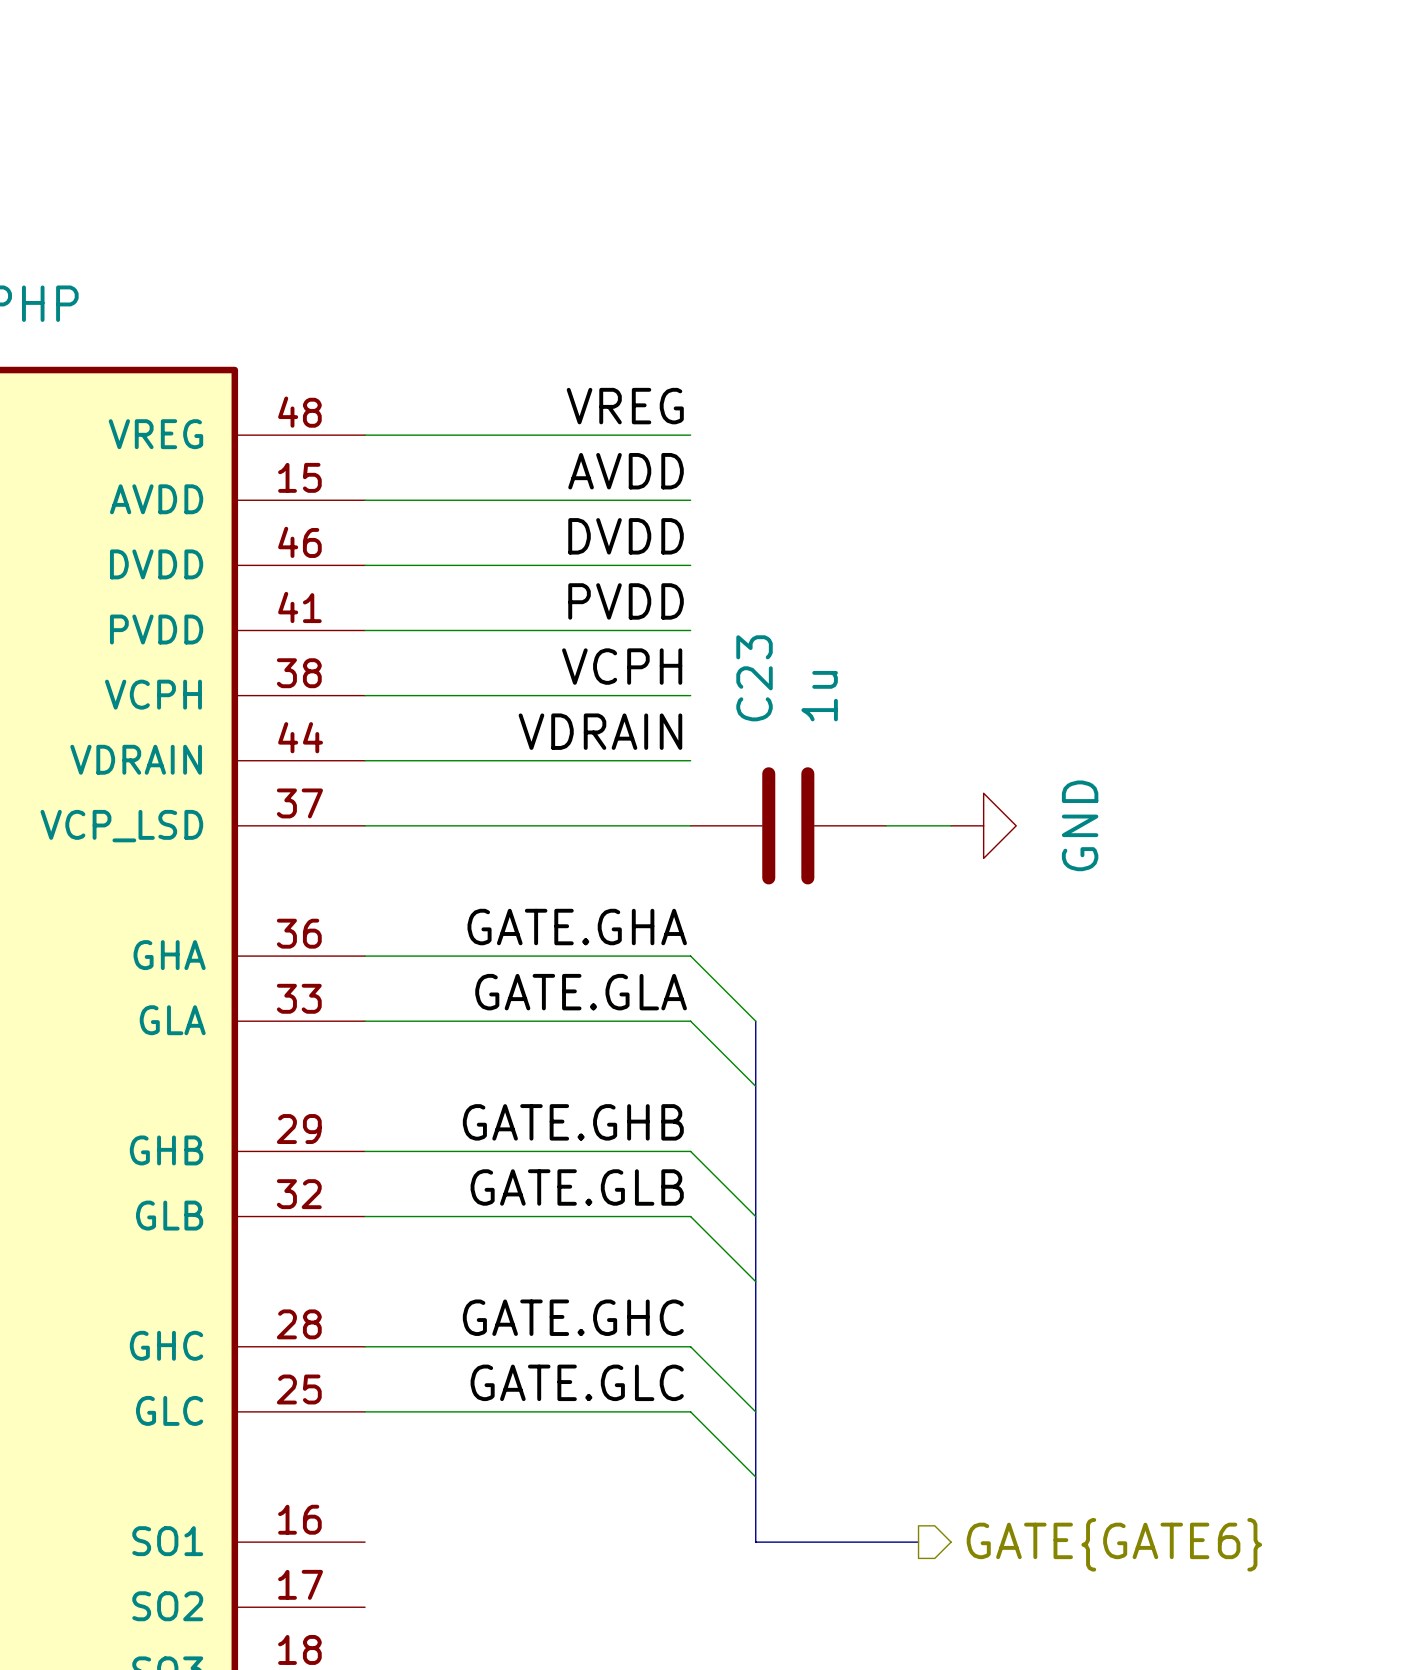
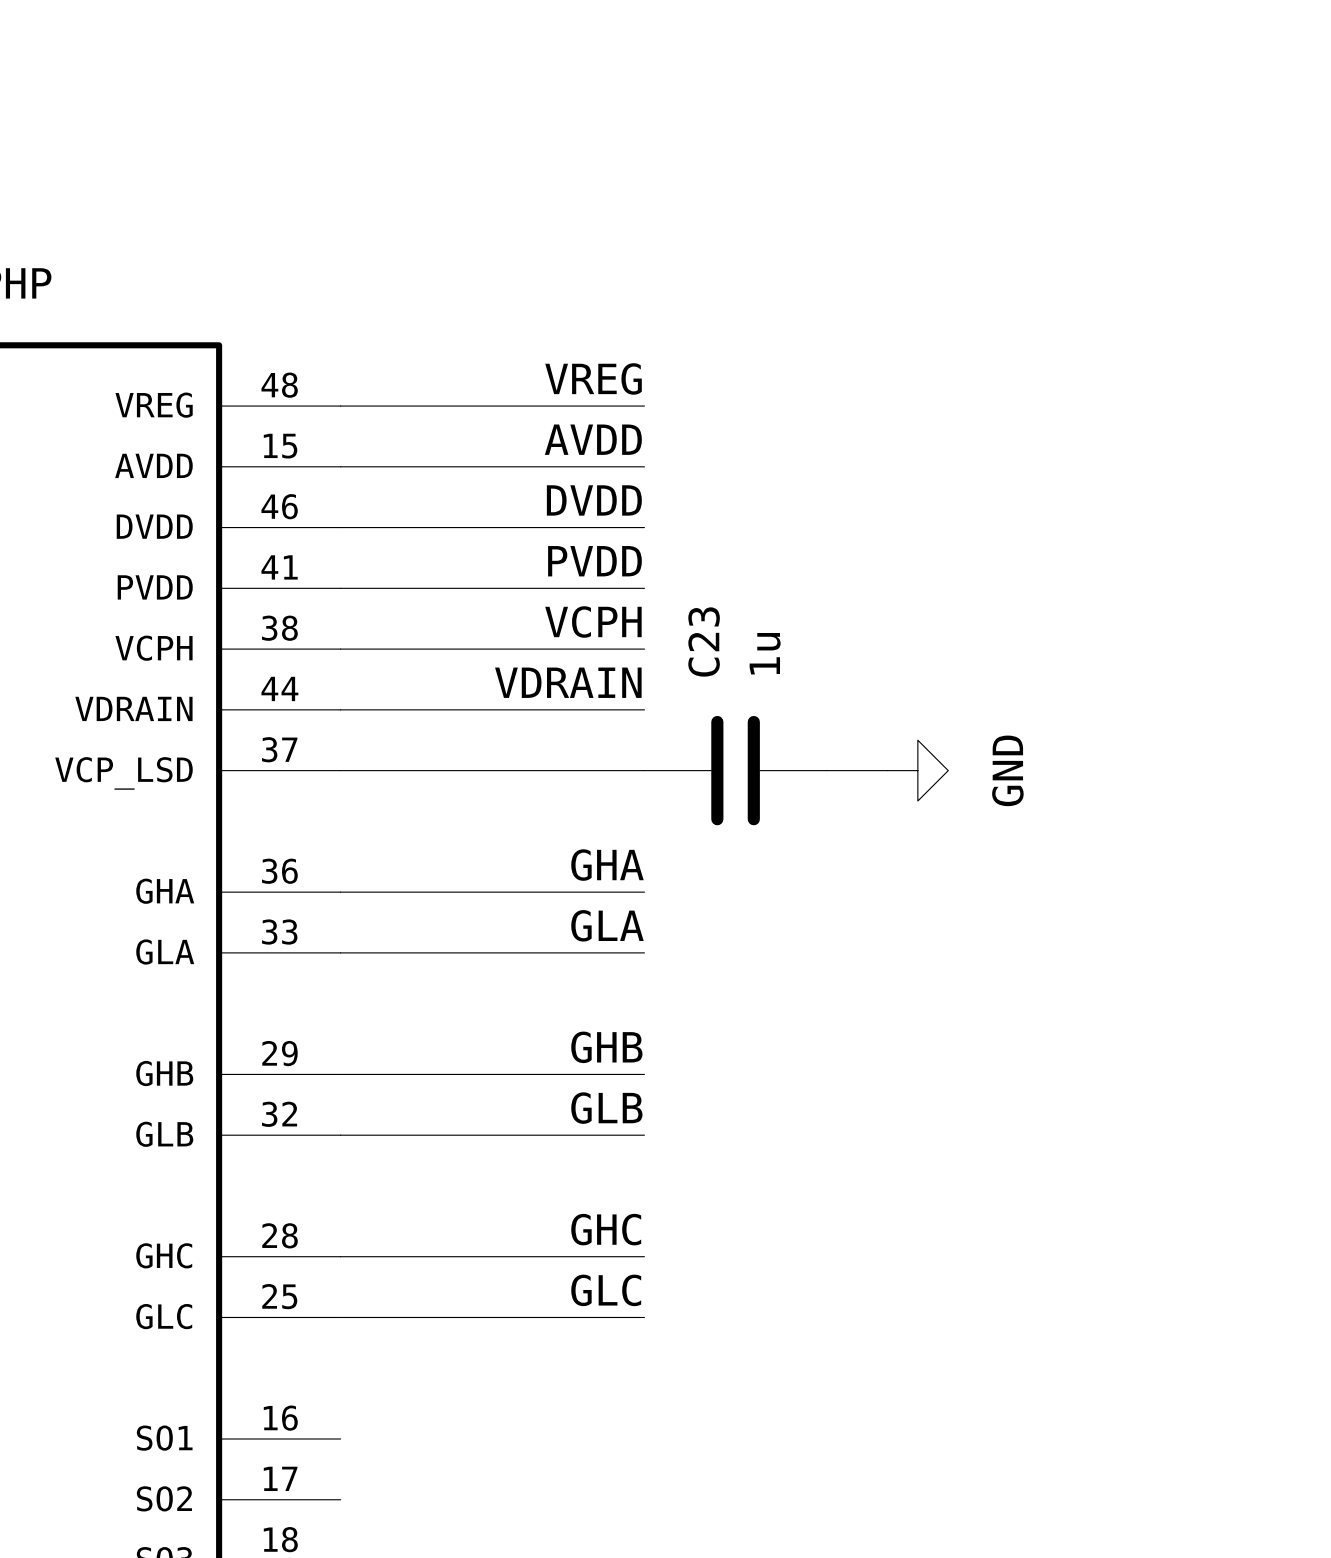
label: GATE.GHA (577, 927) -> GHA (607, 865)
wire: (690, 956) (755, 1021) -> none
label: GATE.GLA (581, 992) -> GLA (607, 925)
wire: (690, 1021) (755, 1086) -> none
bus: (755, 1021) (755, 1542) (918, 1542) -> none
label: GATE.GHB (573, 1122) -> GHB (606, 1047)
wire: (690, 1151) (755, 1216) -> none
label: GATE.GLB (577, 1187) -> GLB (606, 1108)
wire: (690, 1216) (755, 1281) -> none
label: GATE.GHC (573, 1317) -> GHC (606, 1229)
wire: (690, 1346) (755, 1411) -> none
label: GATE.GLC (577, 1382) -> GLC (606, 1290)
wire: (690, 1411) (755, 1477) -> none
hierarchical label: GATE{GATE6} (1114, 1544) -> none

